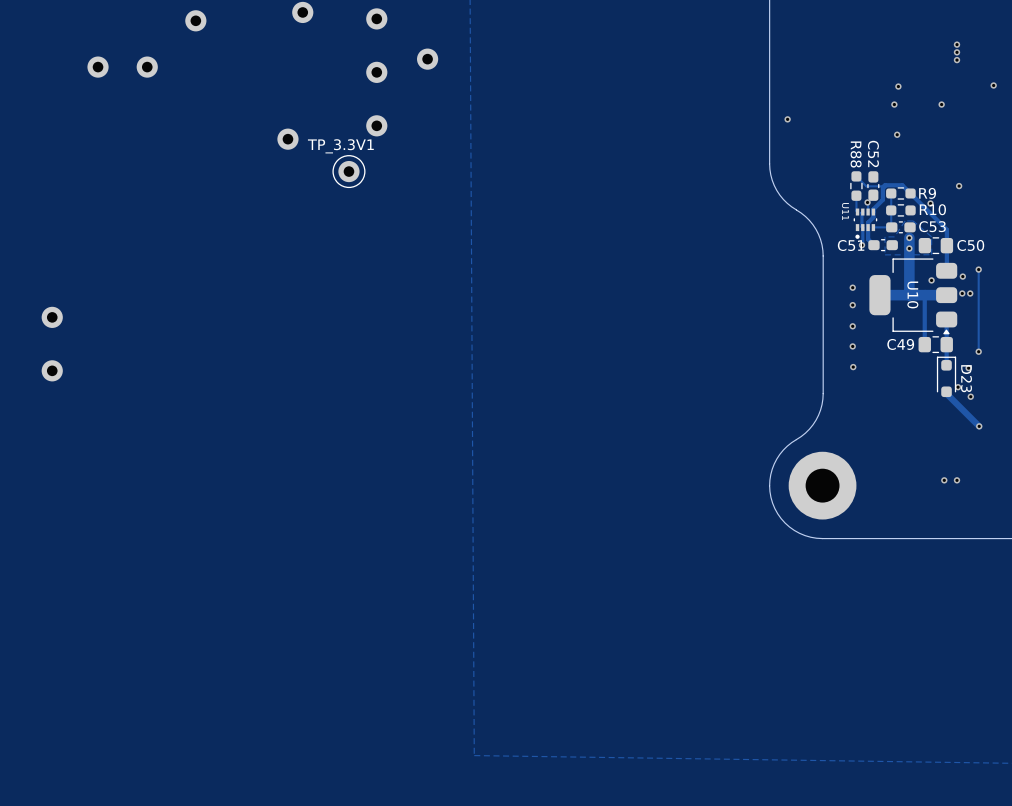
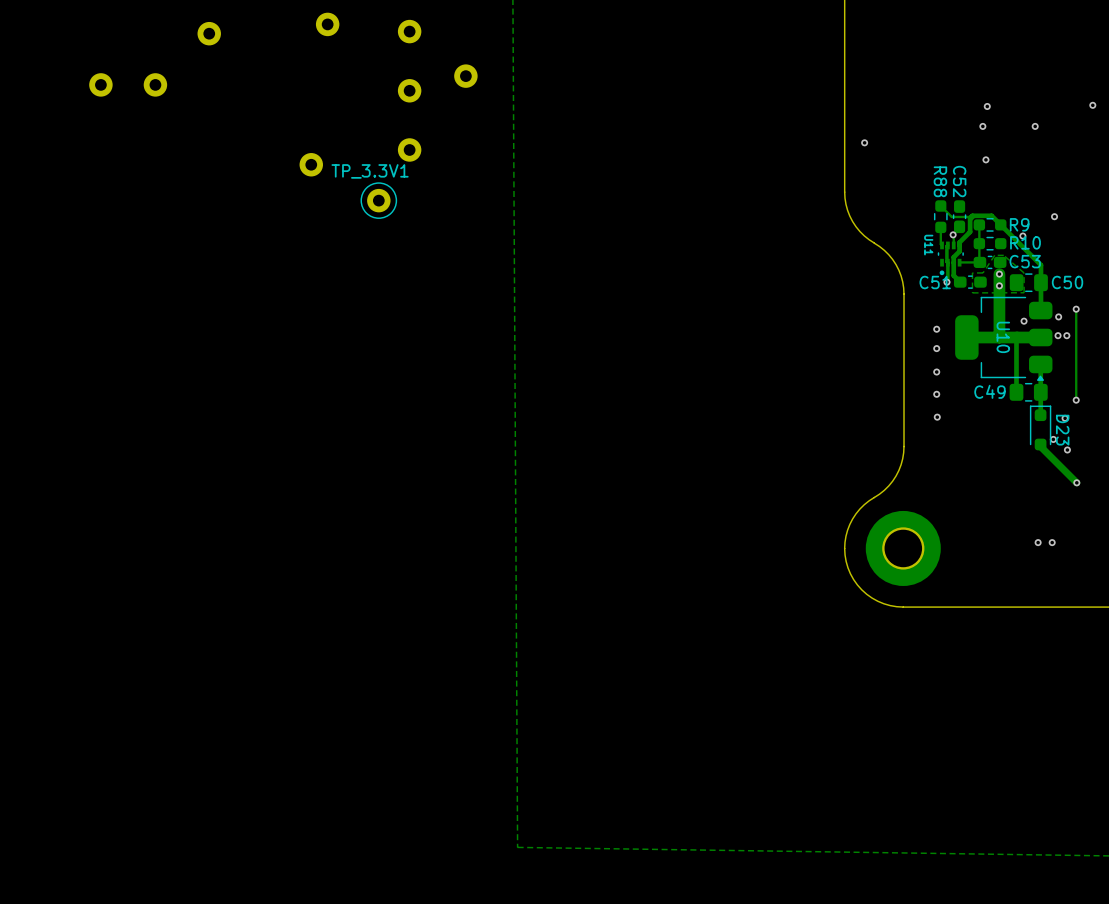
via: (957, 44) -> none
via: (957, 52) -> none
via: (957, 60) -> none
part: (52, 317) -> none
part: (52, 370) -> none

